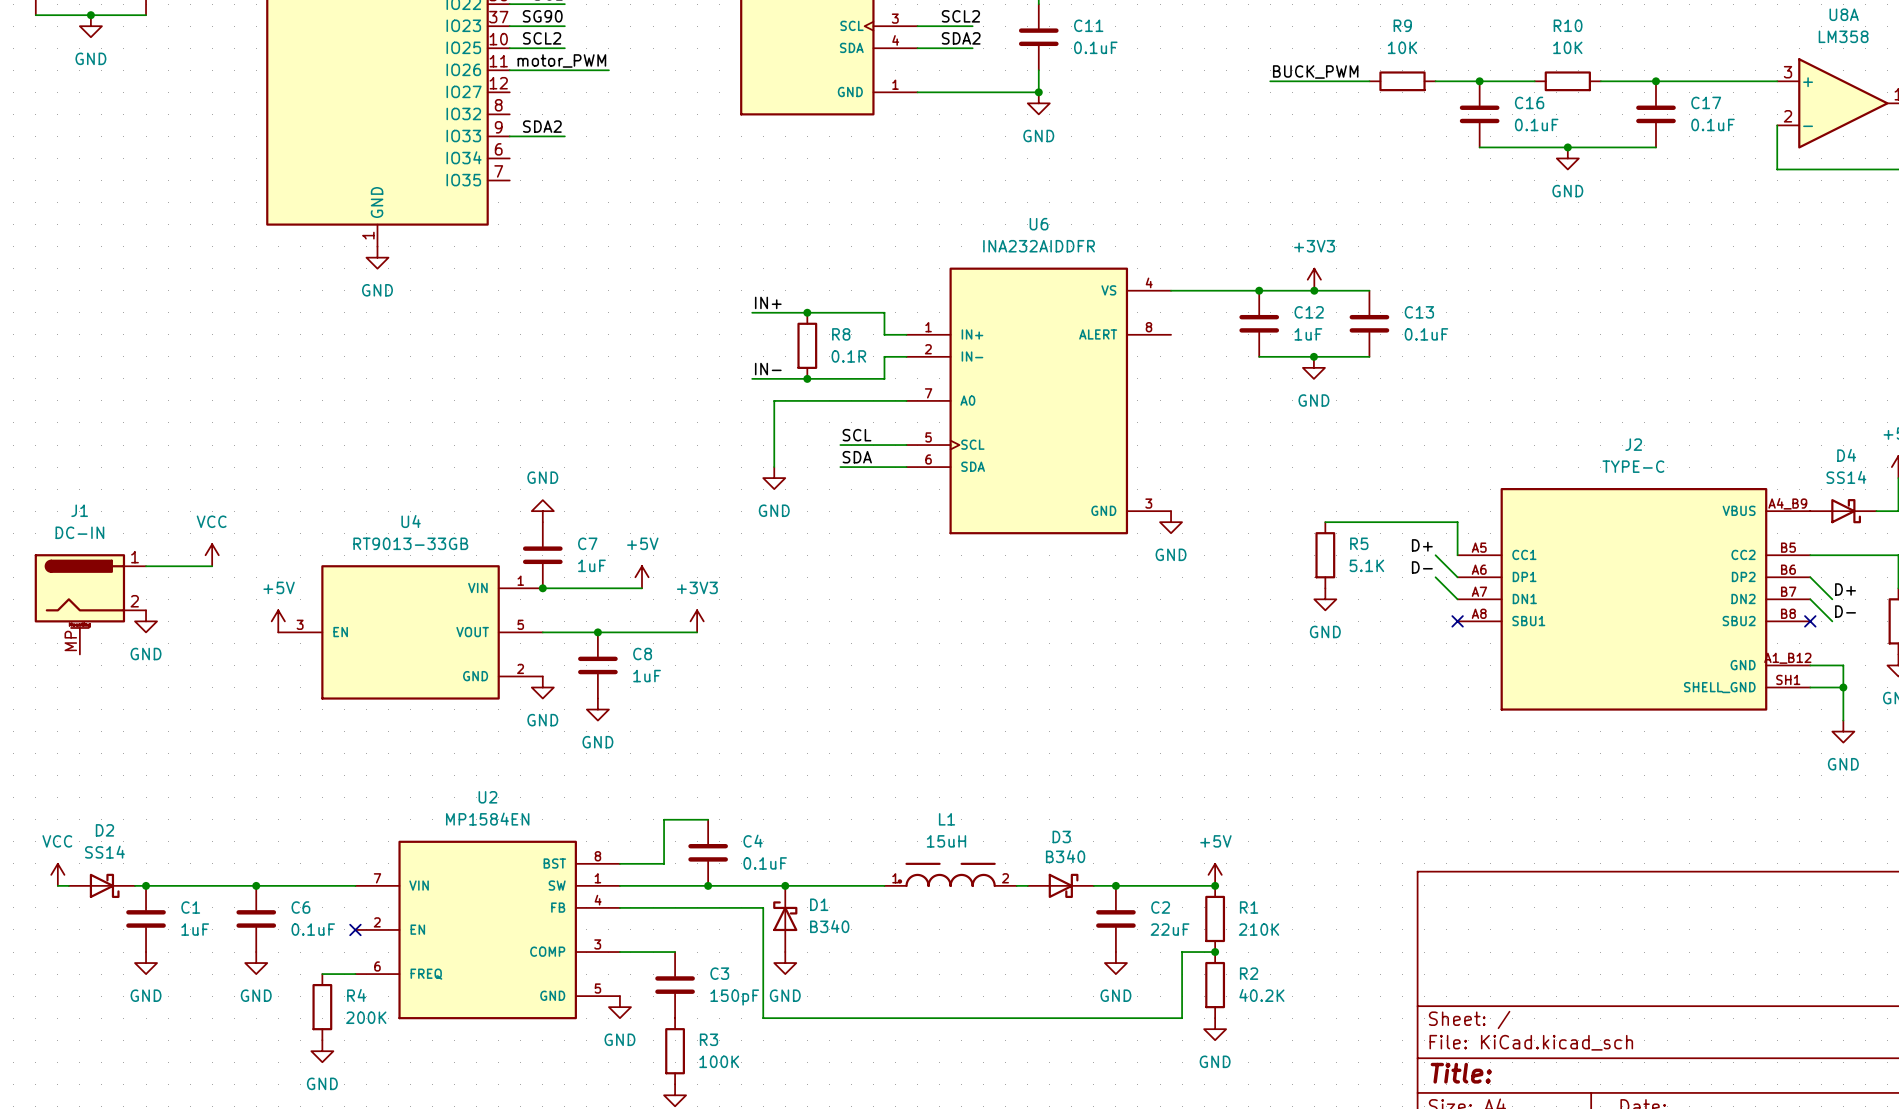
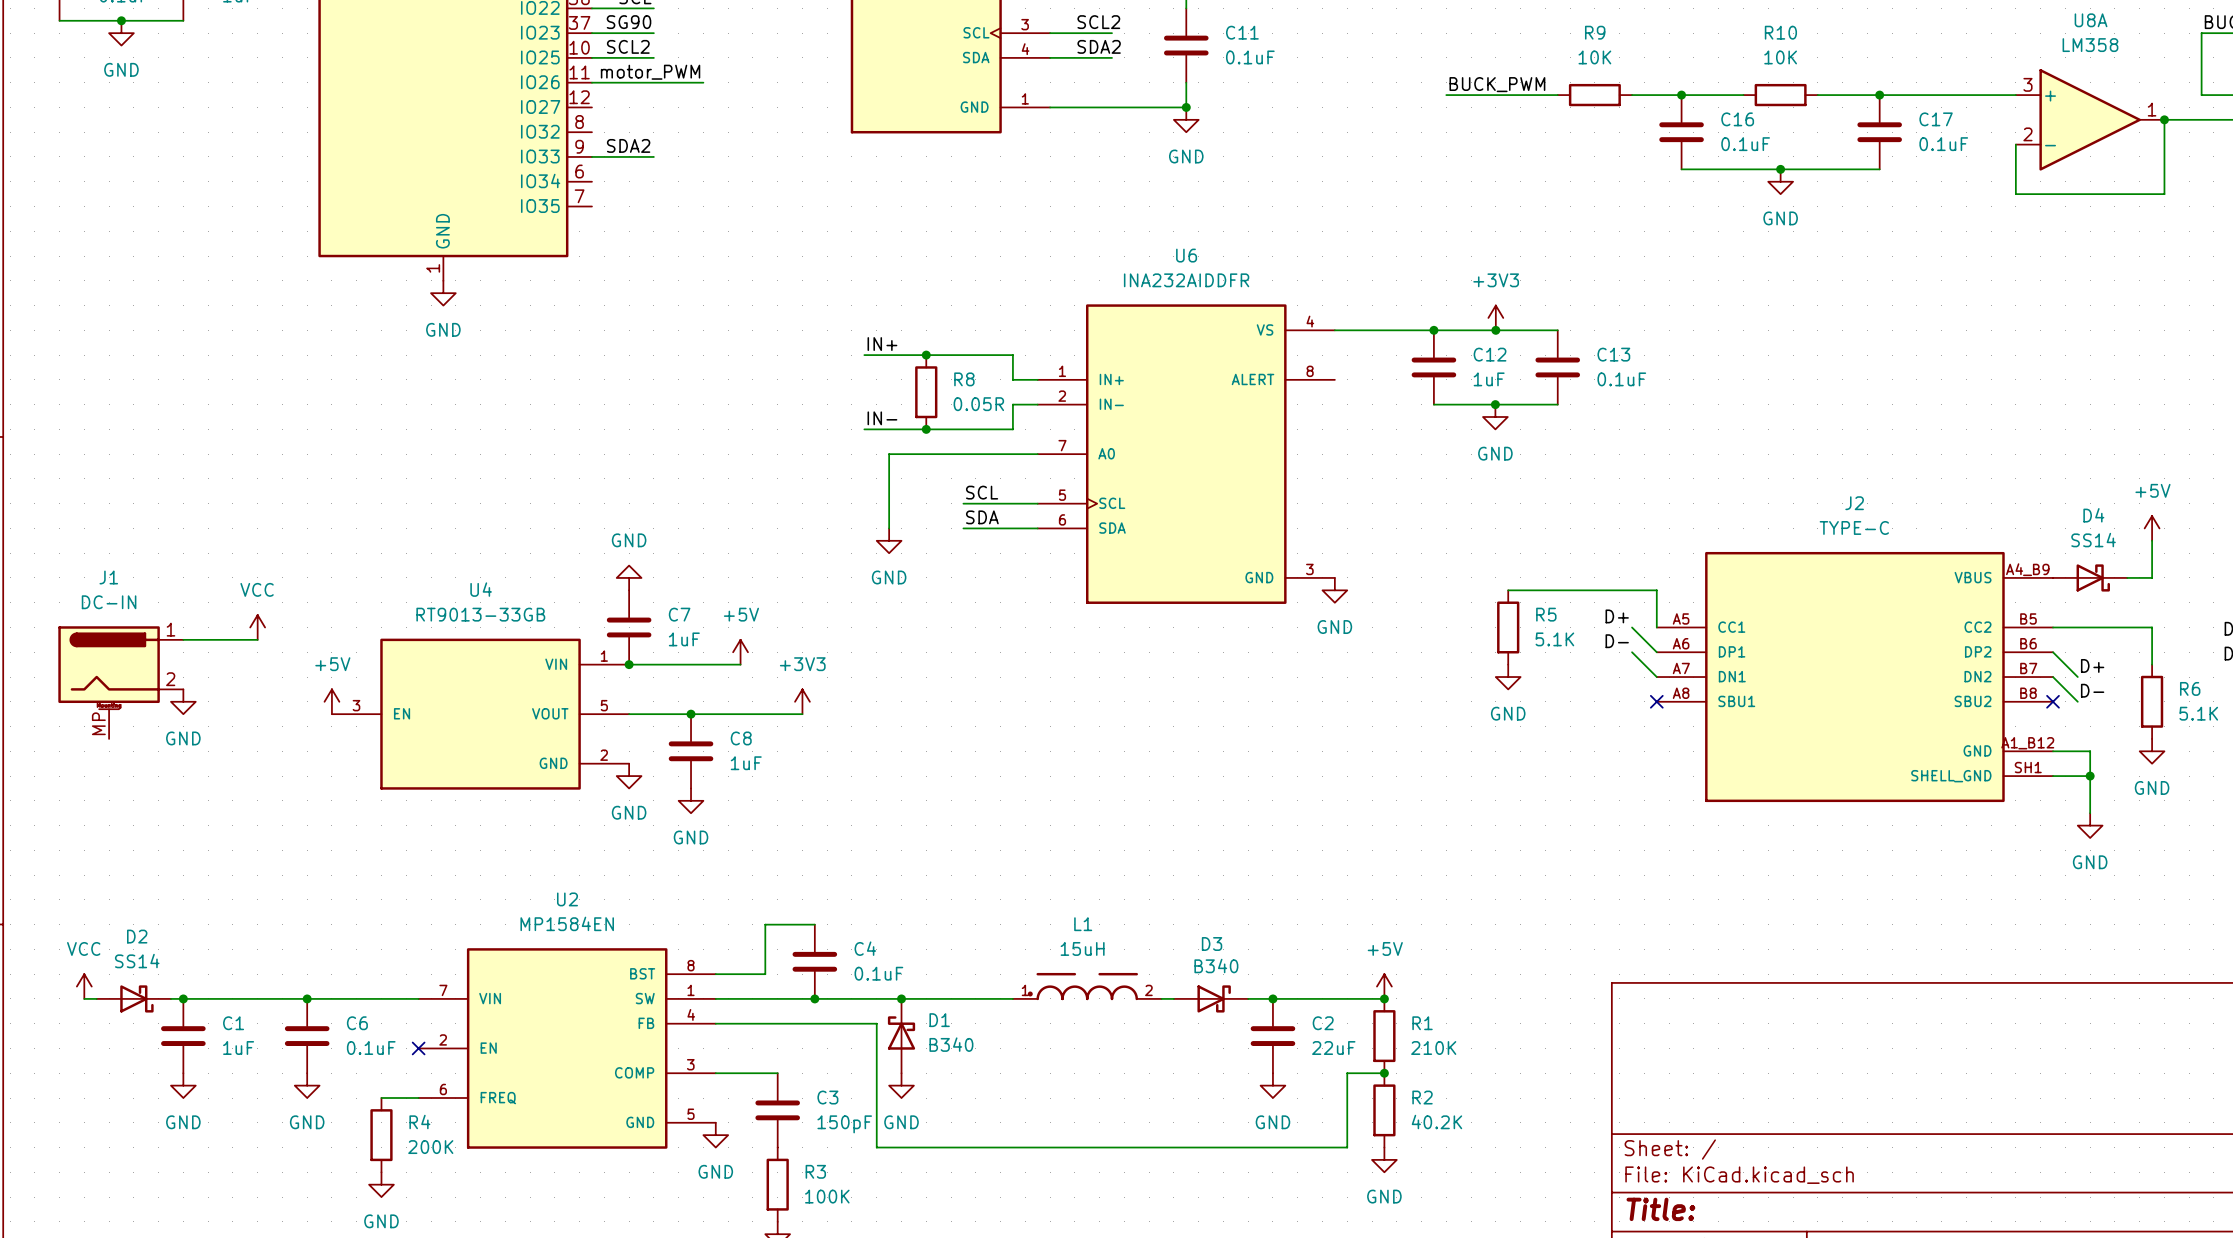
R8 value: 0.1R (848, 356) -> 0.05R (978, 404)

